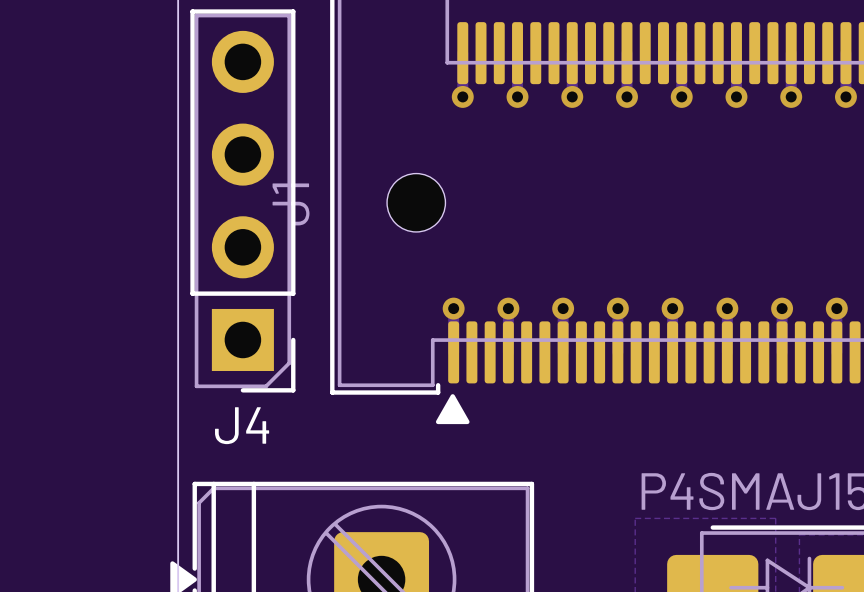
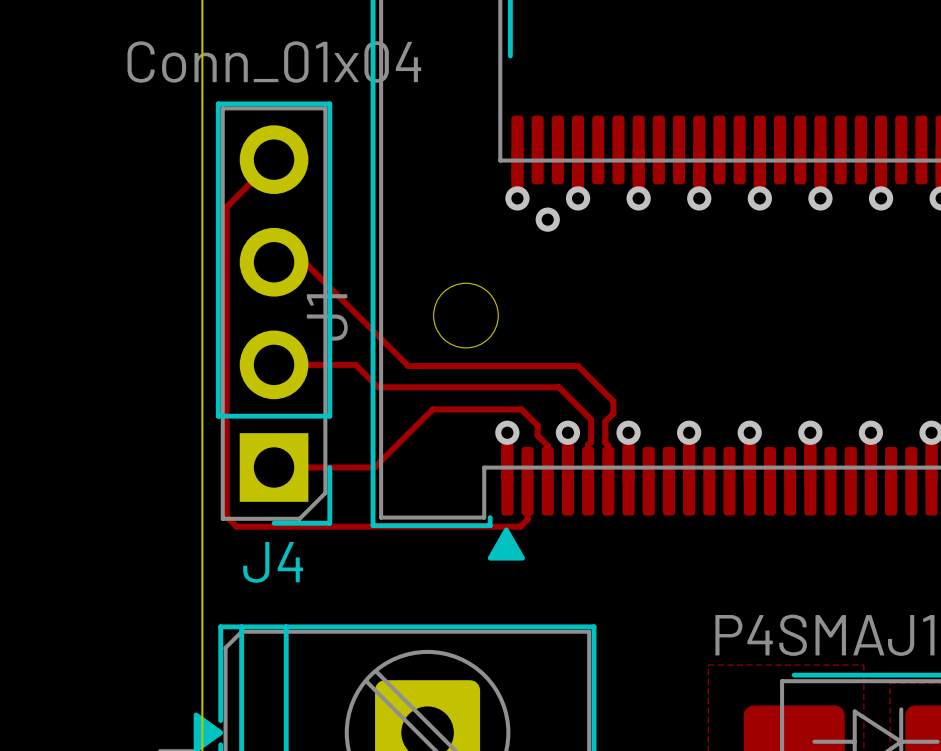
track: none -> (274, 159) (226, 207) (226, 516) (236, 526) (520, 526) (527, 519) (527, 481)
via: none -> (547, 219)
track: none -> (274, 262) (304, 262) (408, 366) (578, 366) (613, 401) (613, 413) (605, 421) (605, 442) (608, 445) (608, 481)
track: none -> (274, 364) (355, 364) (378, 387) (558, 387) (591, 419) (591, 441) (588, 444) (588, 481)
track: none -> (274, 467) (374, 467) (432, 409) (521, 409) (537, 425) (537, 435) (547, 445) (547, 481)

